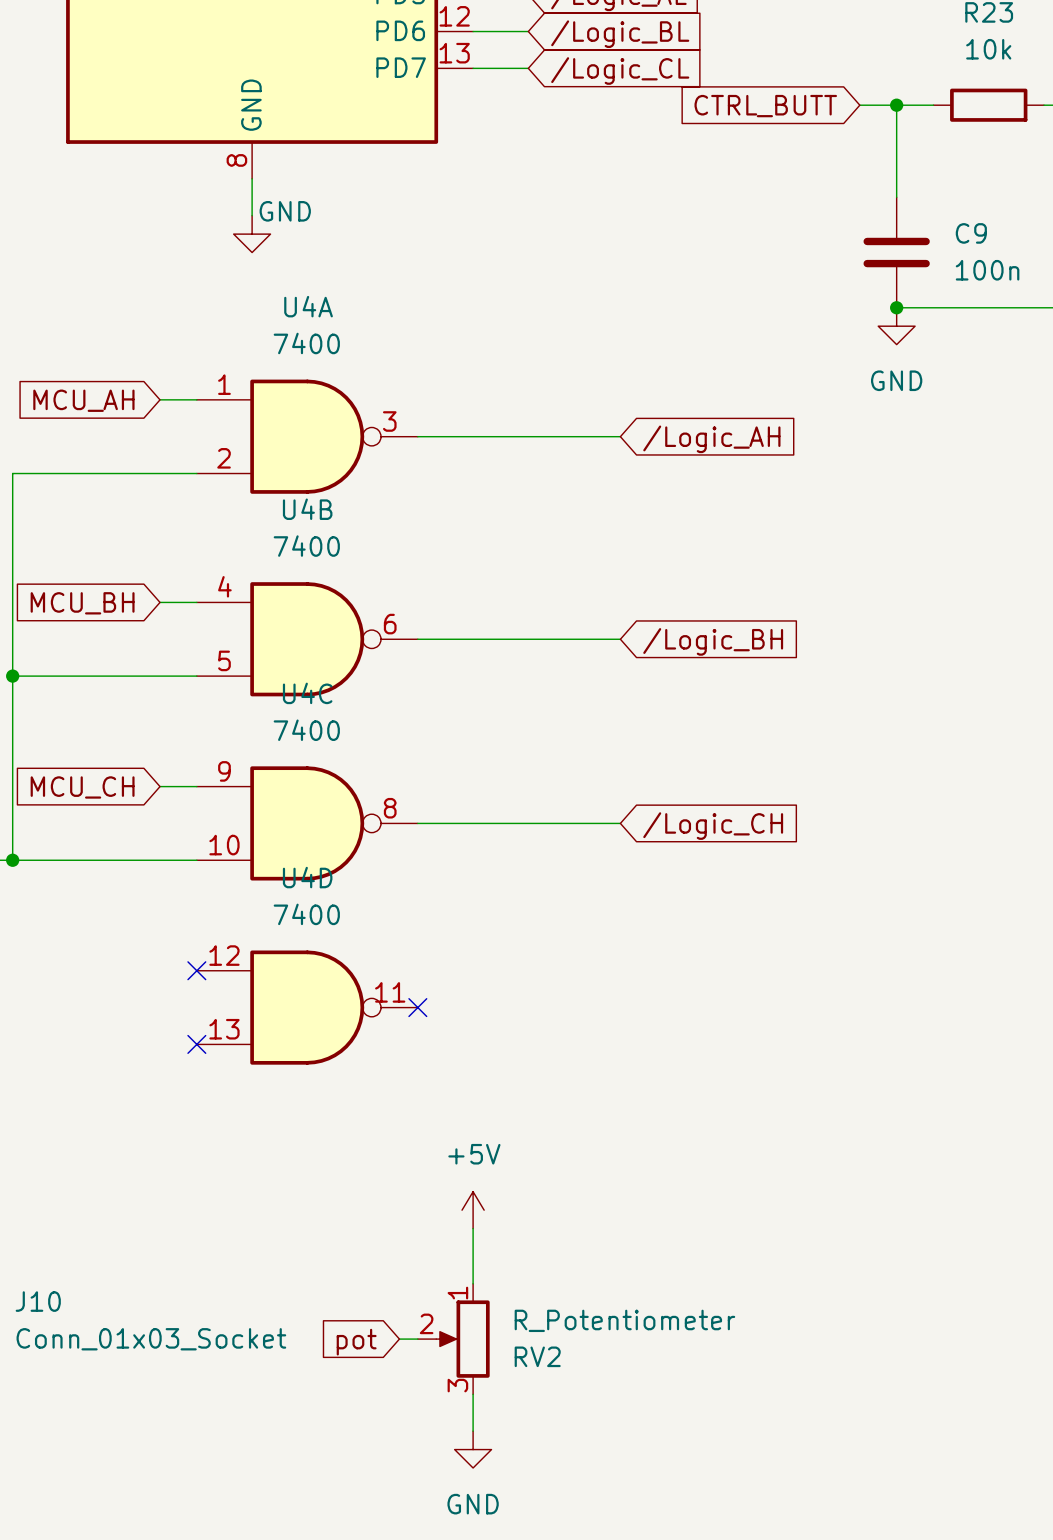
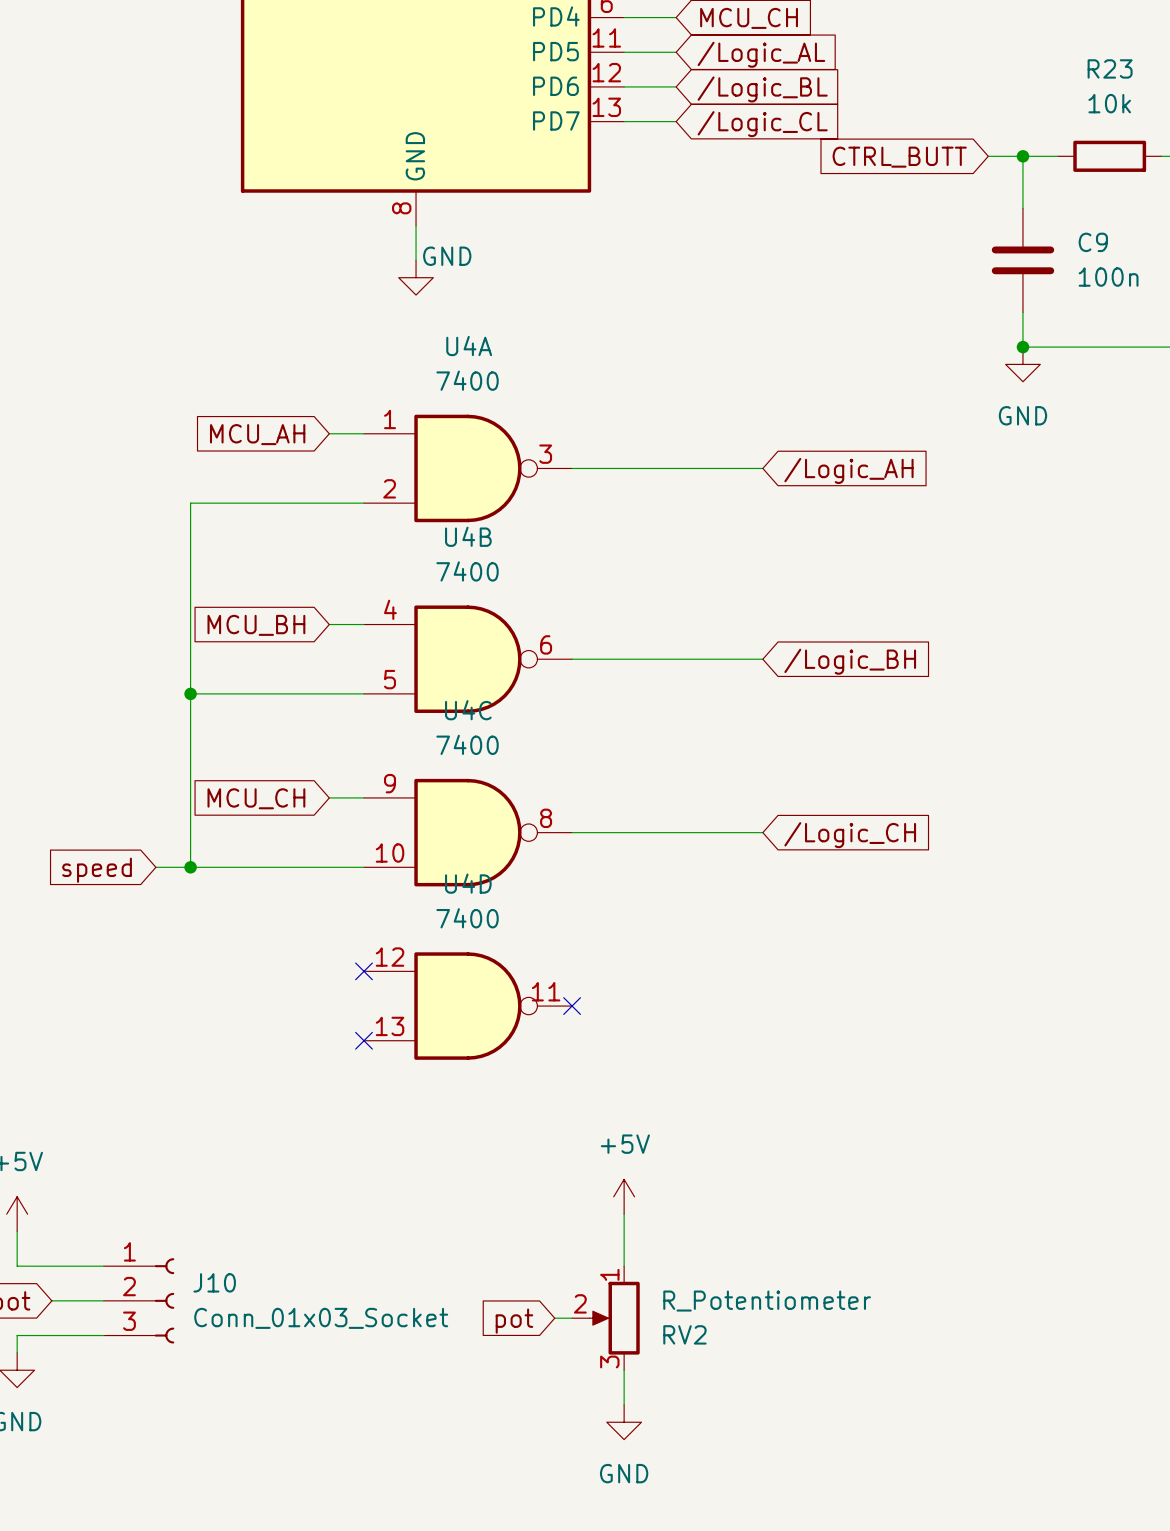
C9 position: (896, 252) -> (1022, 260)

